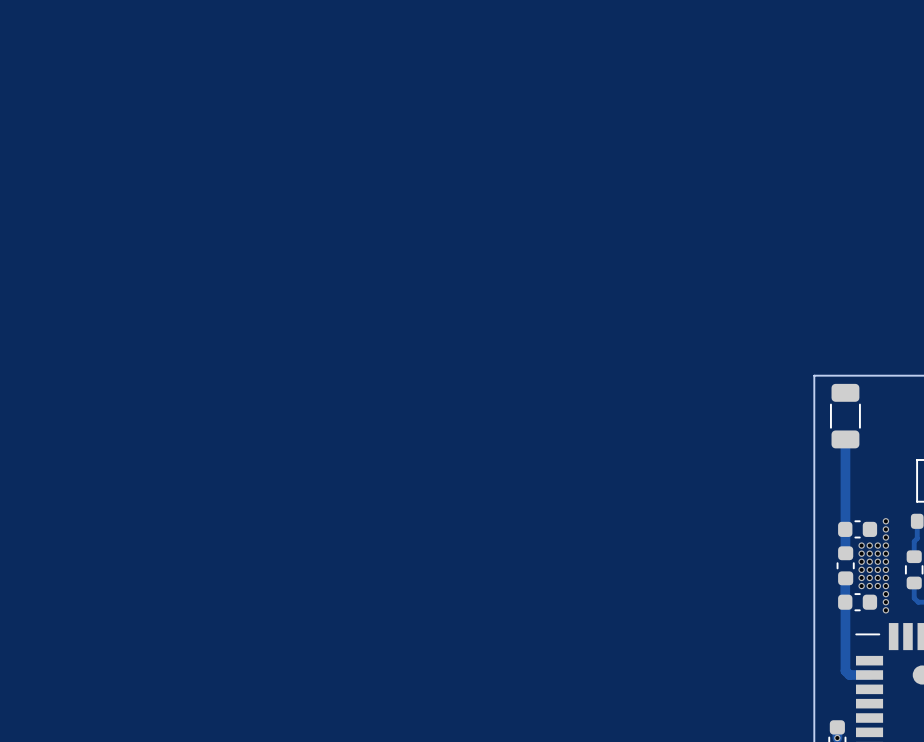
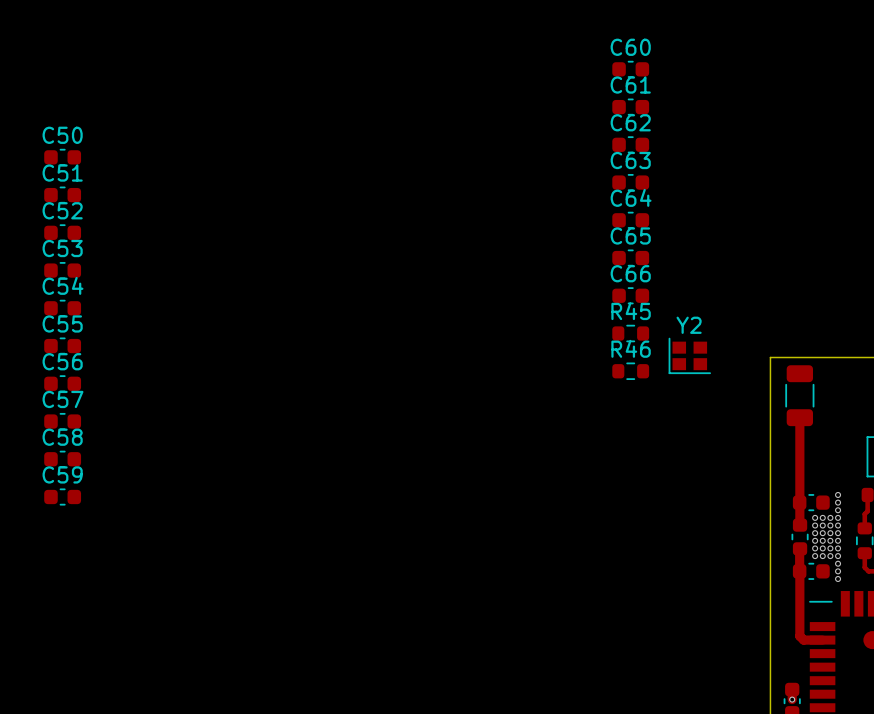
C60: none -> (630, 69)
C61: none -> (630, 107)
C62: none -> (630, 144)
C50: none -> (62, 157)
C63: none -> (630, 182)
C51: none -> (62, 195)
C64: none -> (630, 220)
C52: none -> (62, 232)
C65: none -> (630, 258)
C53: none -> (62, 270)
C66: none -> (630, 295)
C54: none -> (62, 308)
R45: none -> (630, 333)
C55: none -> (62, 346)
Y2: none -> (689, 355)
R46: none -> (630, 371)
C56: none -> (62, 383)
C57: none -> (62, 421)
C58: none -> (62, 459)
C59: none -> (62, 496)

